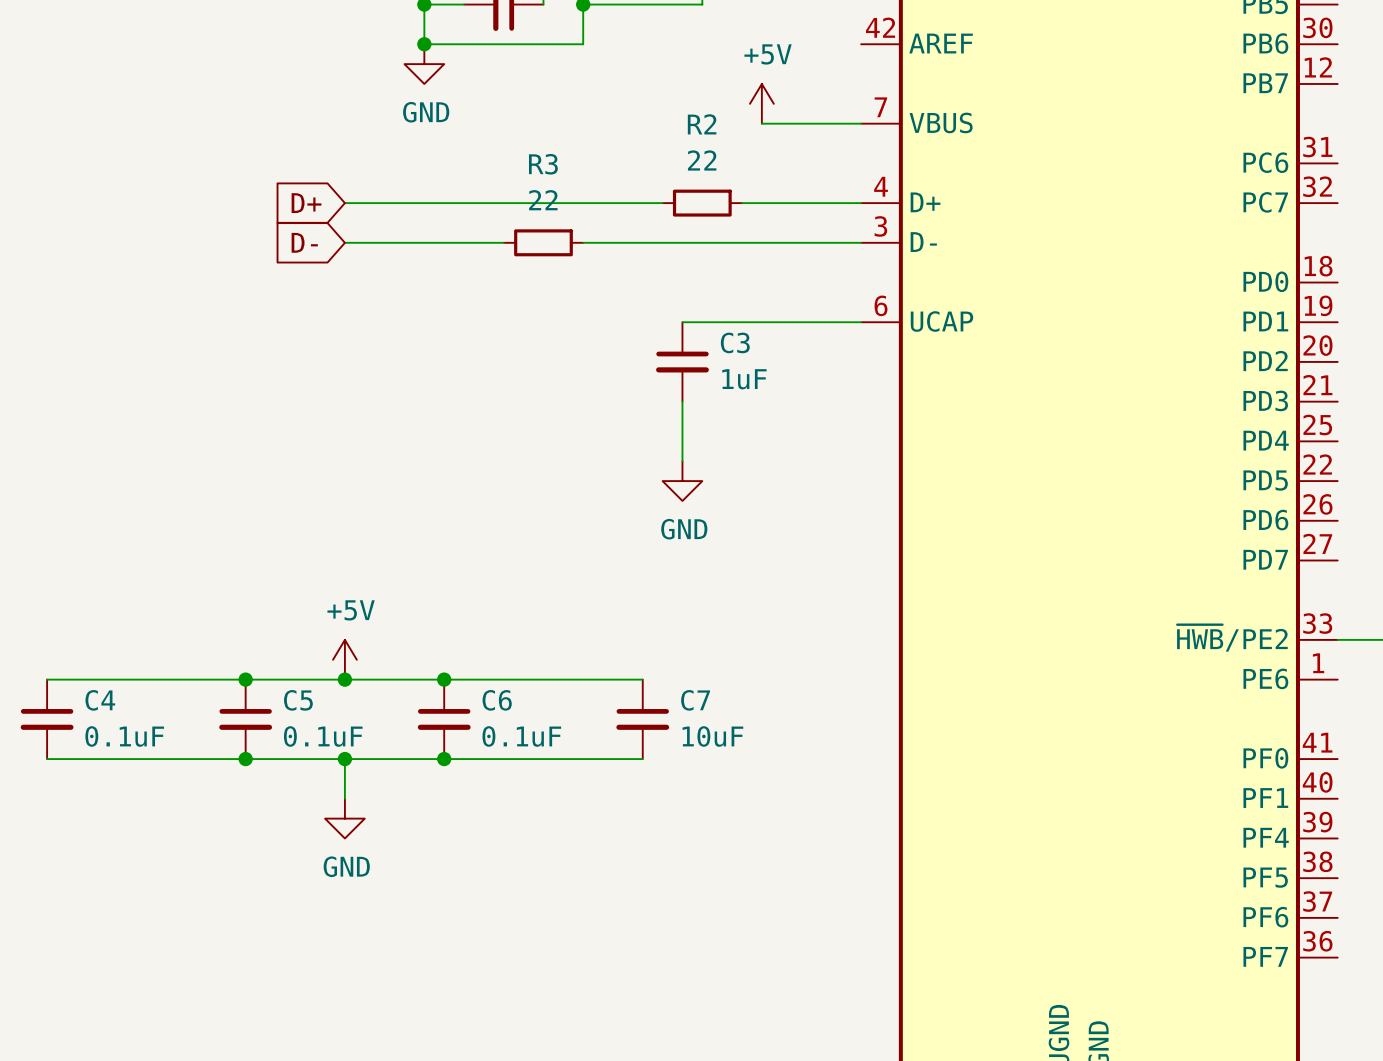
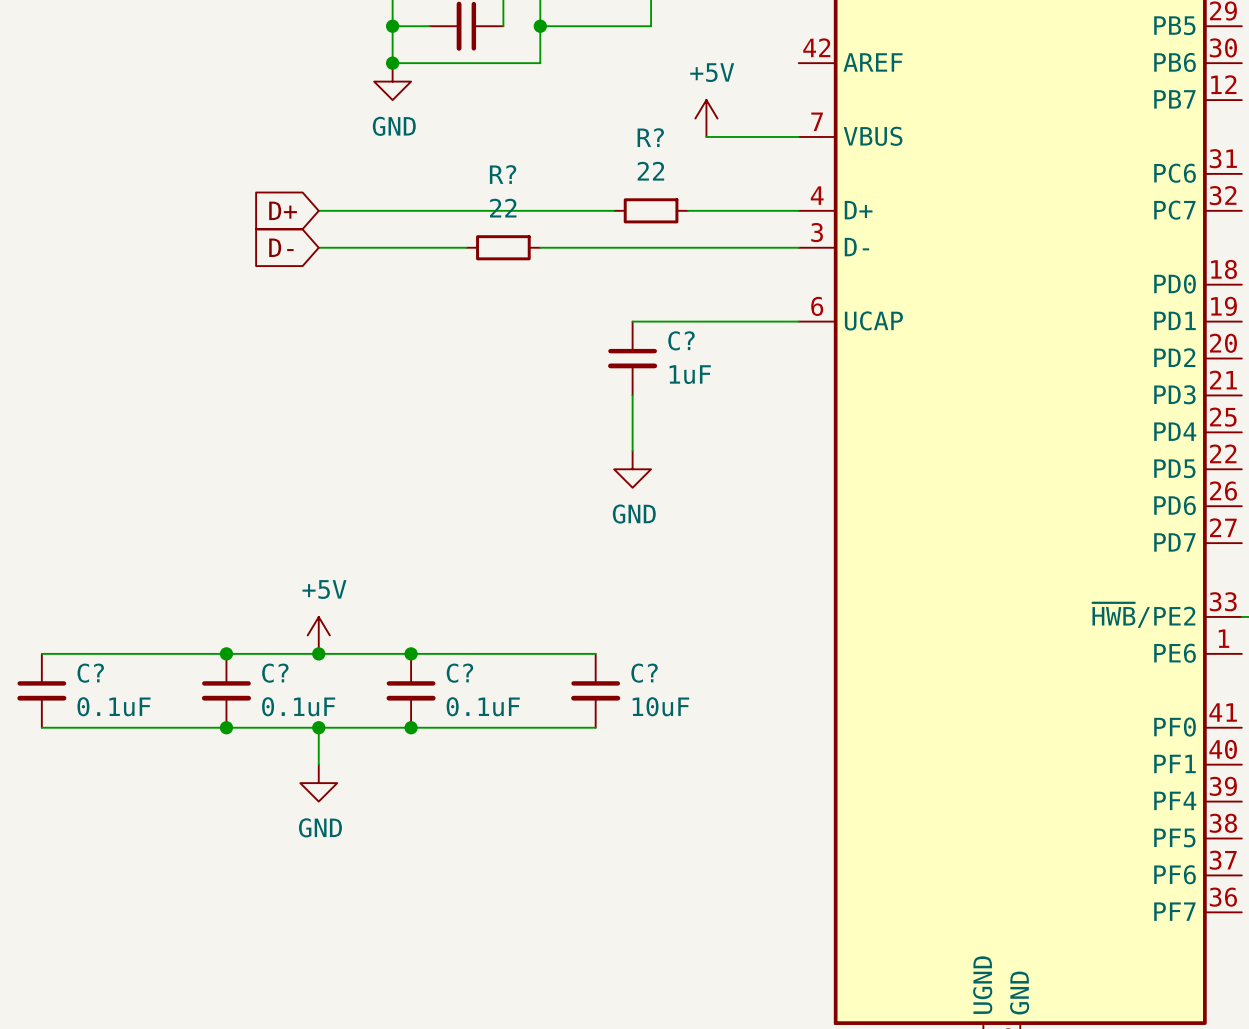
R2 name: R2 (702, 124) -> R? (650, 137)
R3 name: R3 (543, 164) -> R? (503, 174)
C3 name: C3 (735, 342) -> C? (681, 340)
C4 name: C4 (100, 700) -> C? (90, 673)
C5 name: C5 (298, 700) -> C? (275, 673)
C6 name: C6 (497, 700) -> C? (459, 673)
C7 name: C7 (695, 700) -> C? (644, 673)

